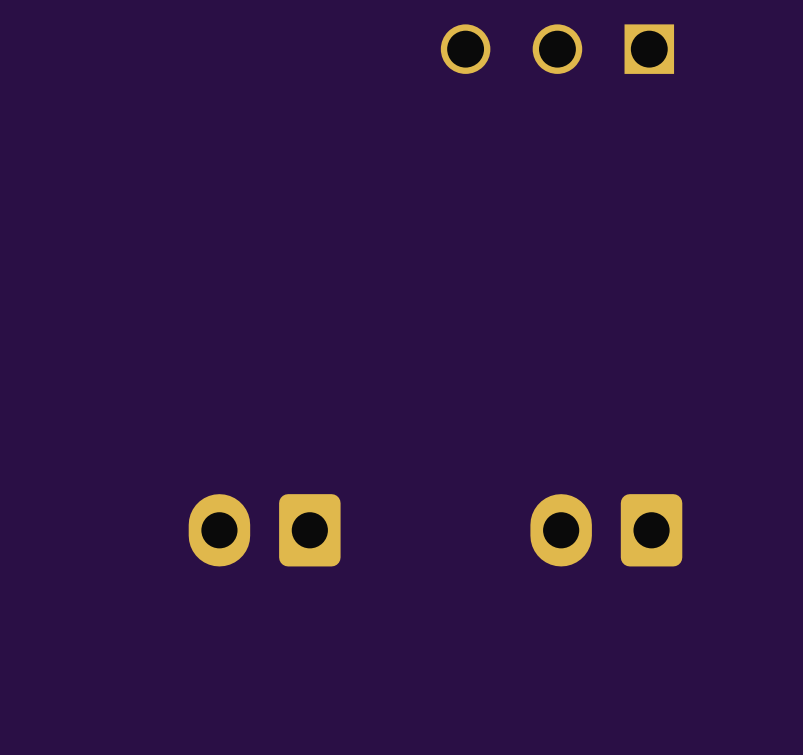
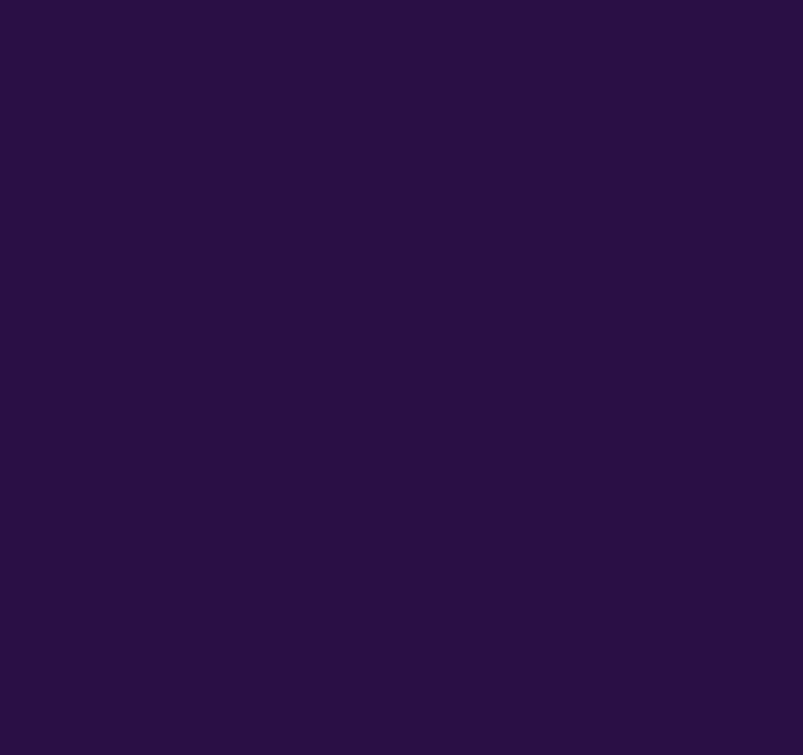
part: (557, 49) -> none
part: (264, 530) -> none
part: (606, 530) -> none

